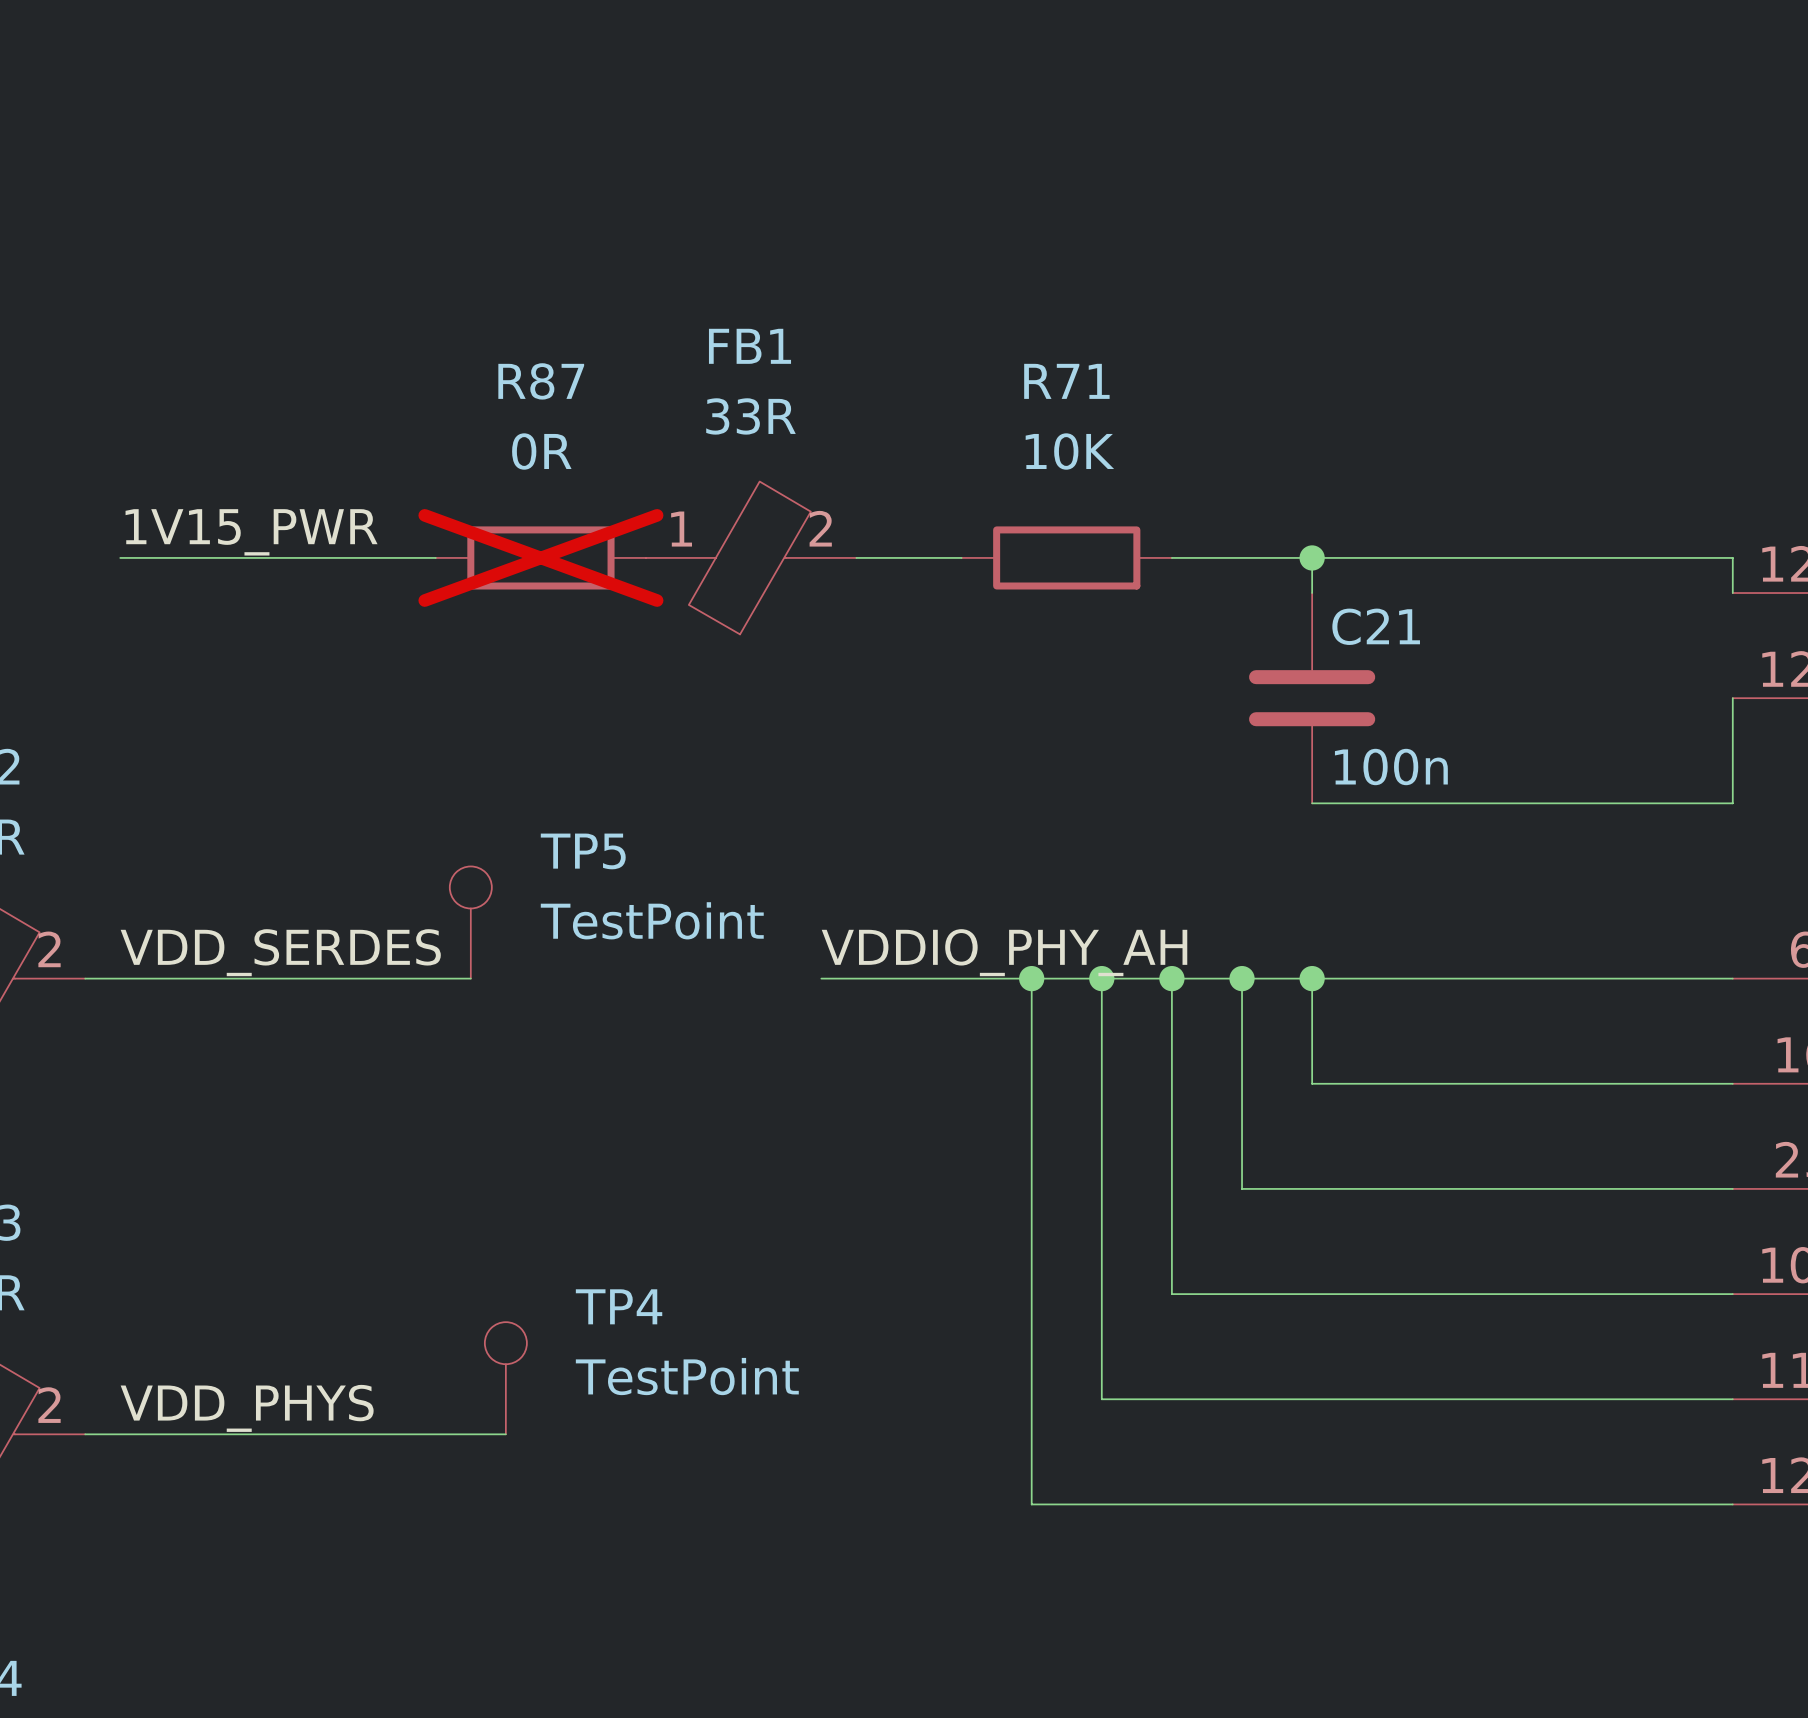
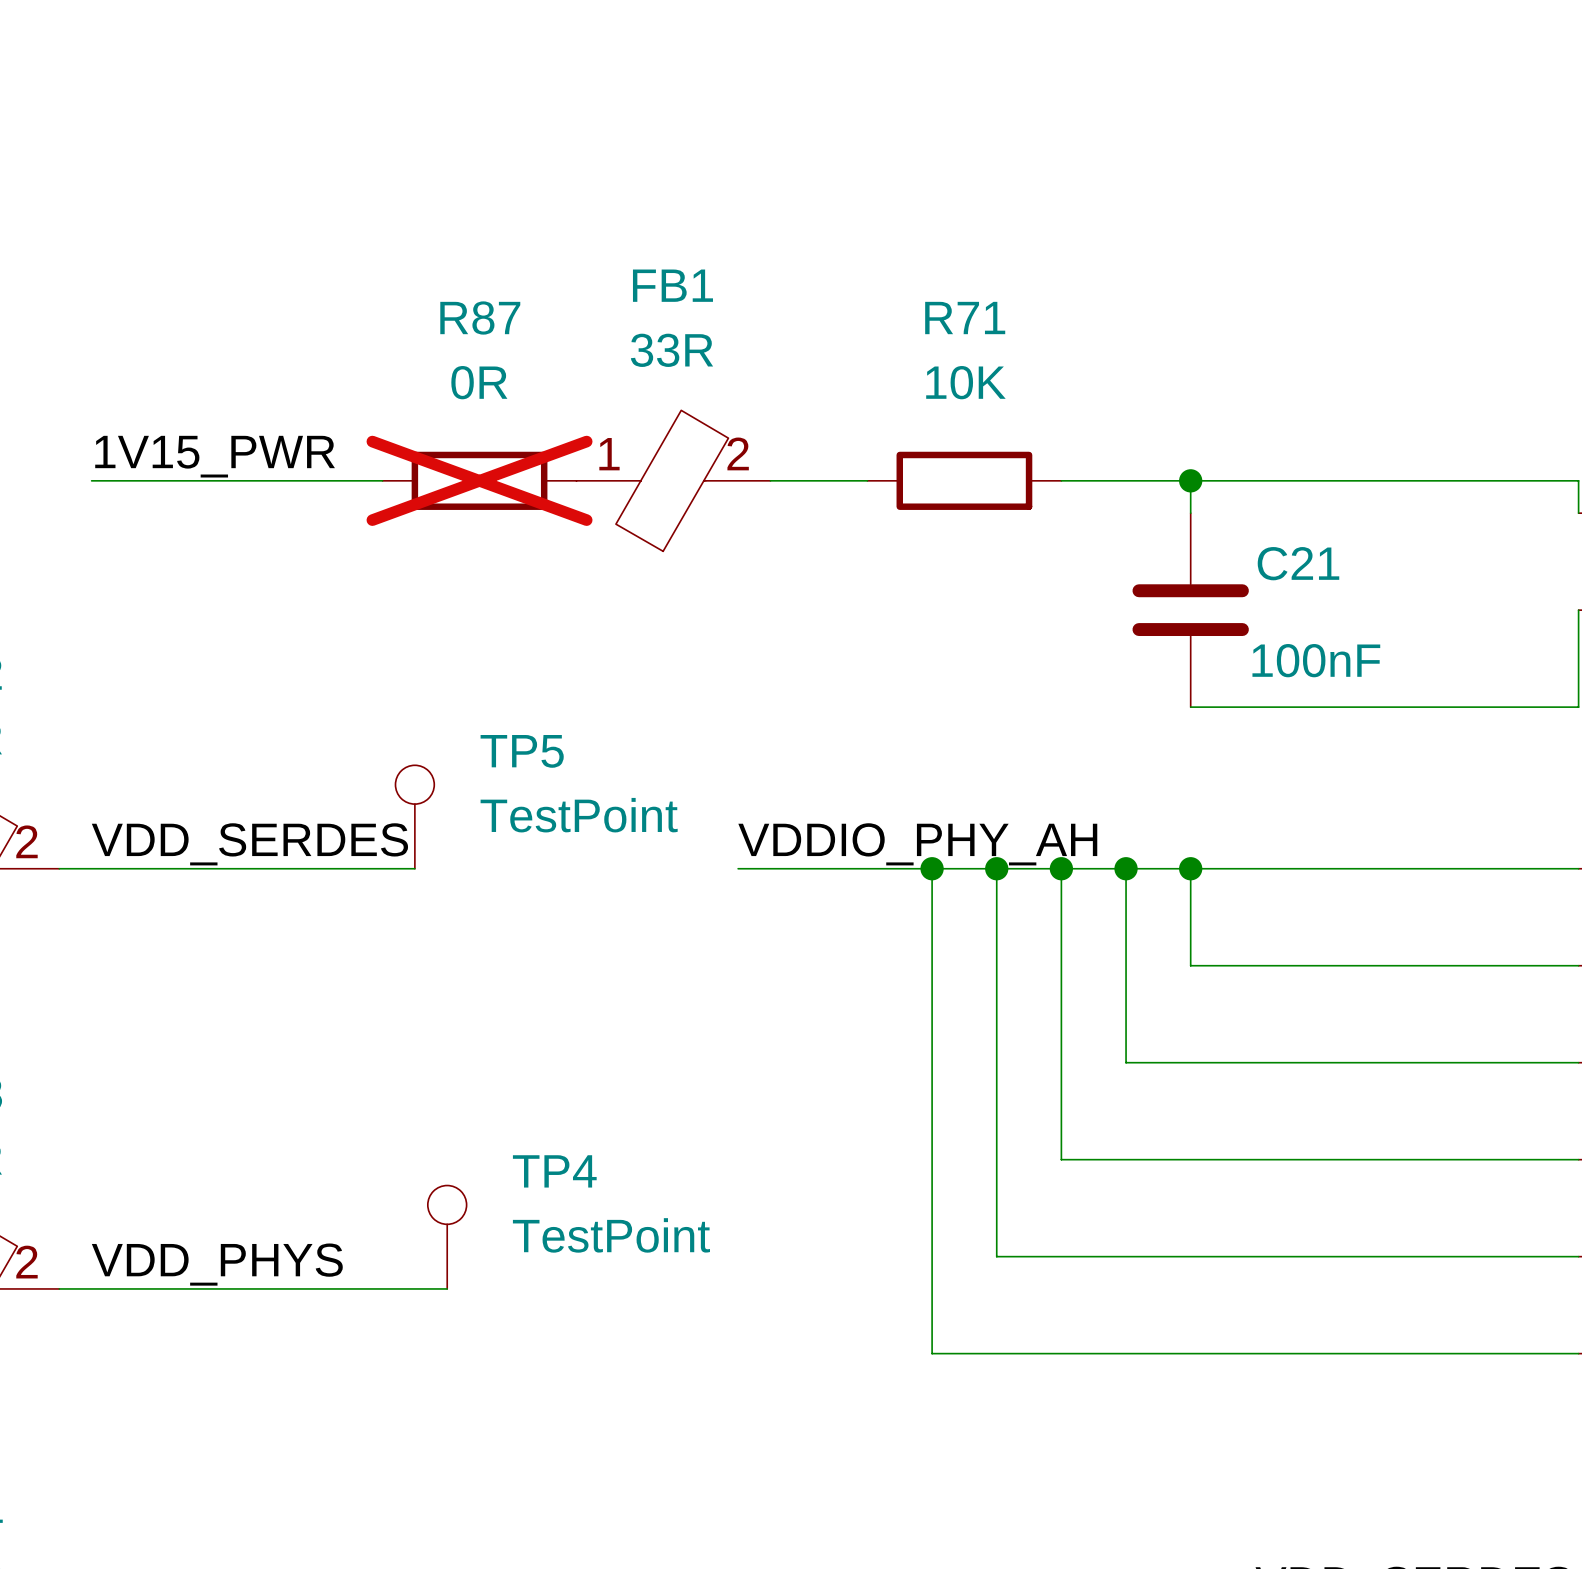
C21 name position: C21 (1376, 626) -> C21 (1298, 563)
C21 value: 100n (1391, 767) -> 100nF (1316, 660)

